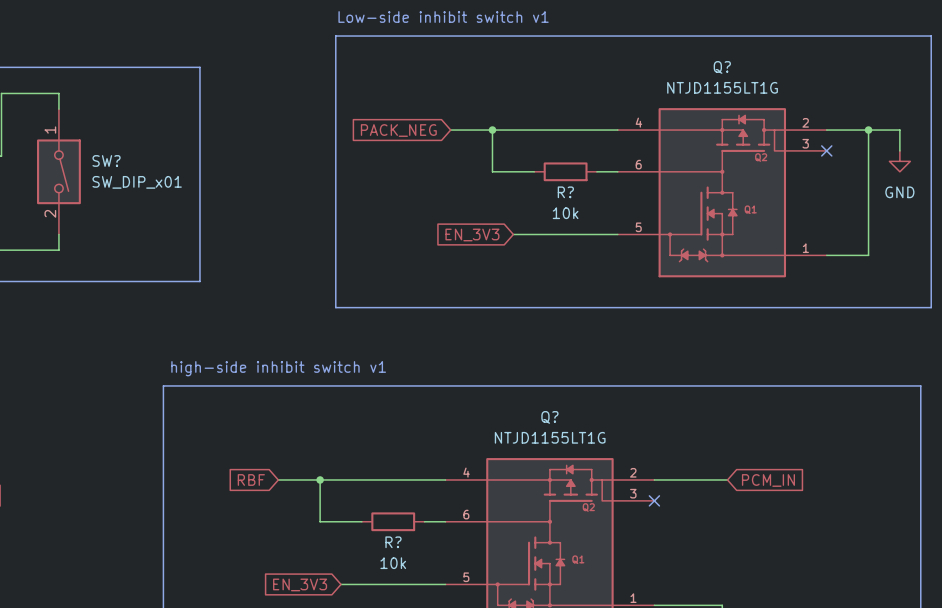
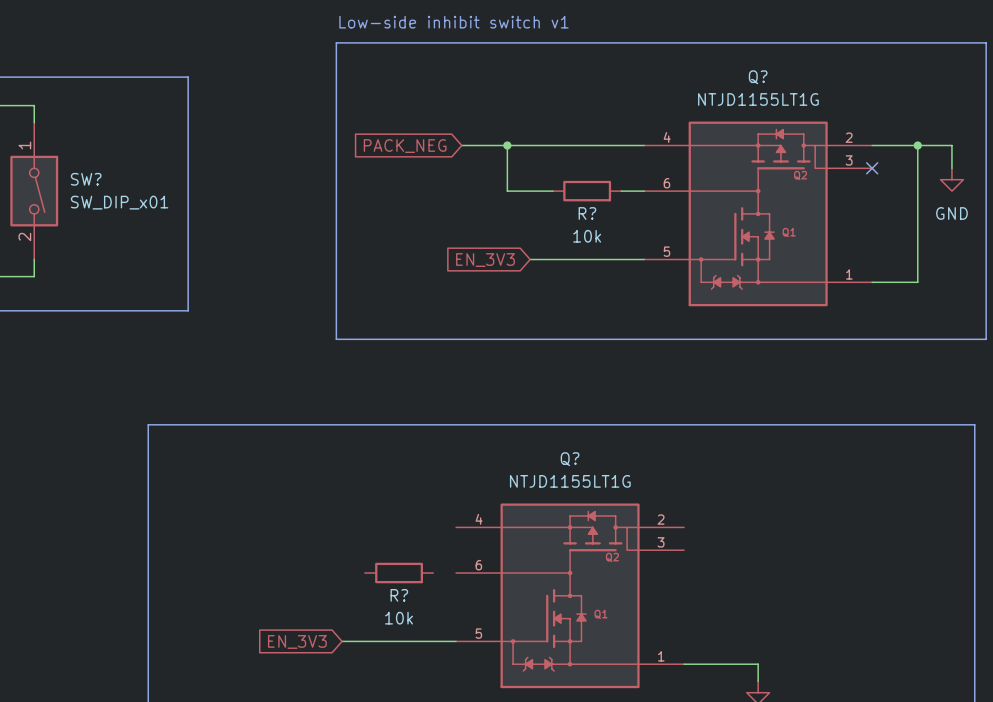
text: high-side inhibit switch v1 (278, 368) -> none
global label: RBF (251, 479) -> none
wire: (278, 479) (445, 479) -> none
wire: (320, 479) (320, 521) (361, 521) -> none
junction: (320, 479) -> none
wire: (654, 479) (727, 479) -> none
global label: PCM_IN (768, 480) -> none
no-connect mark: (654, 500) -> none
wire: (424, 521) (445, 521) -> none

